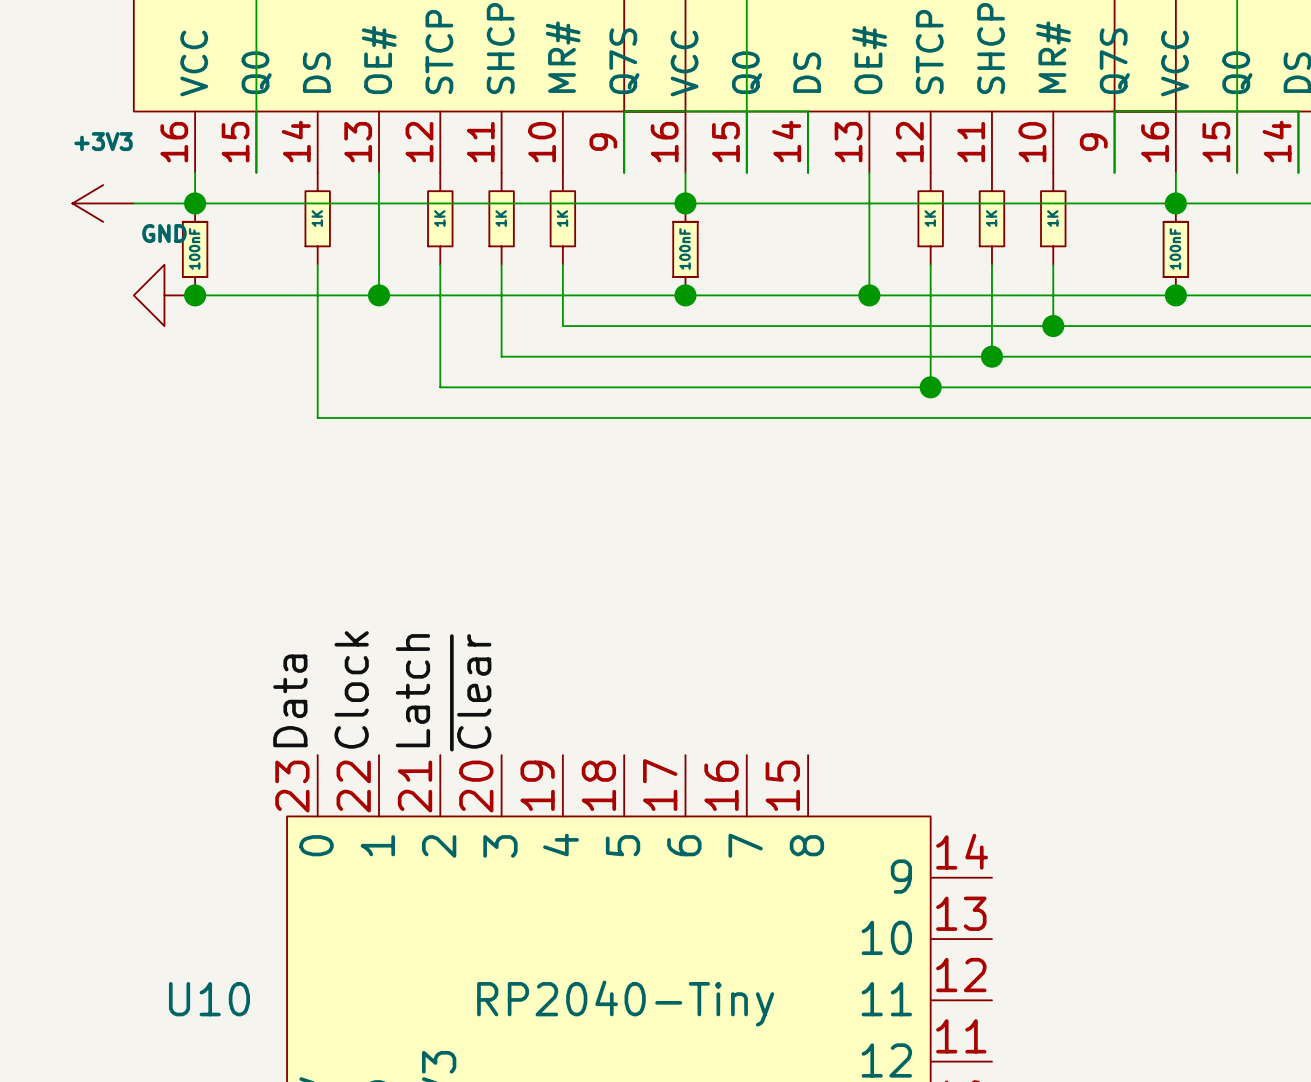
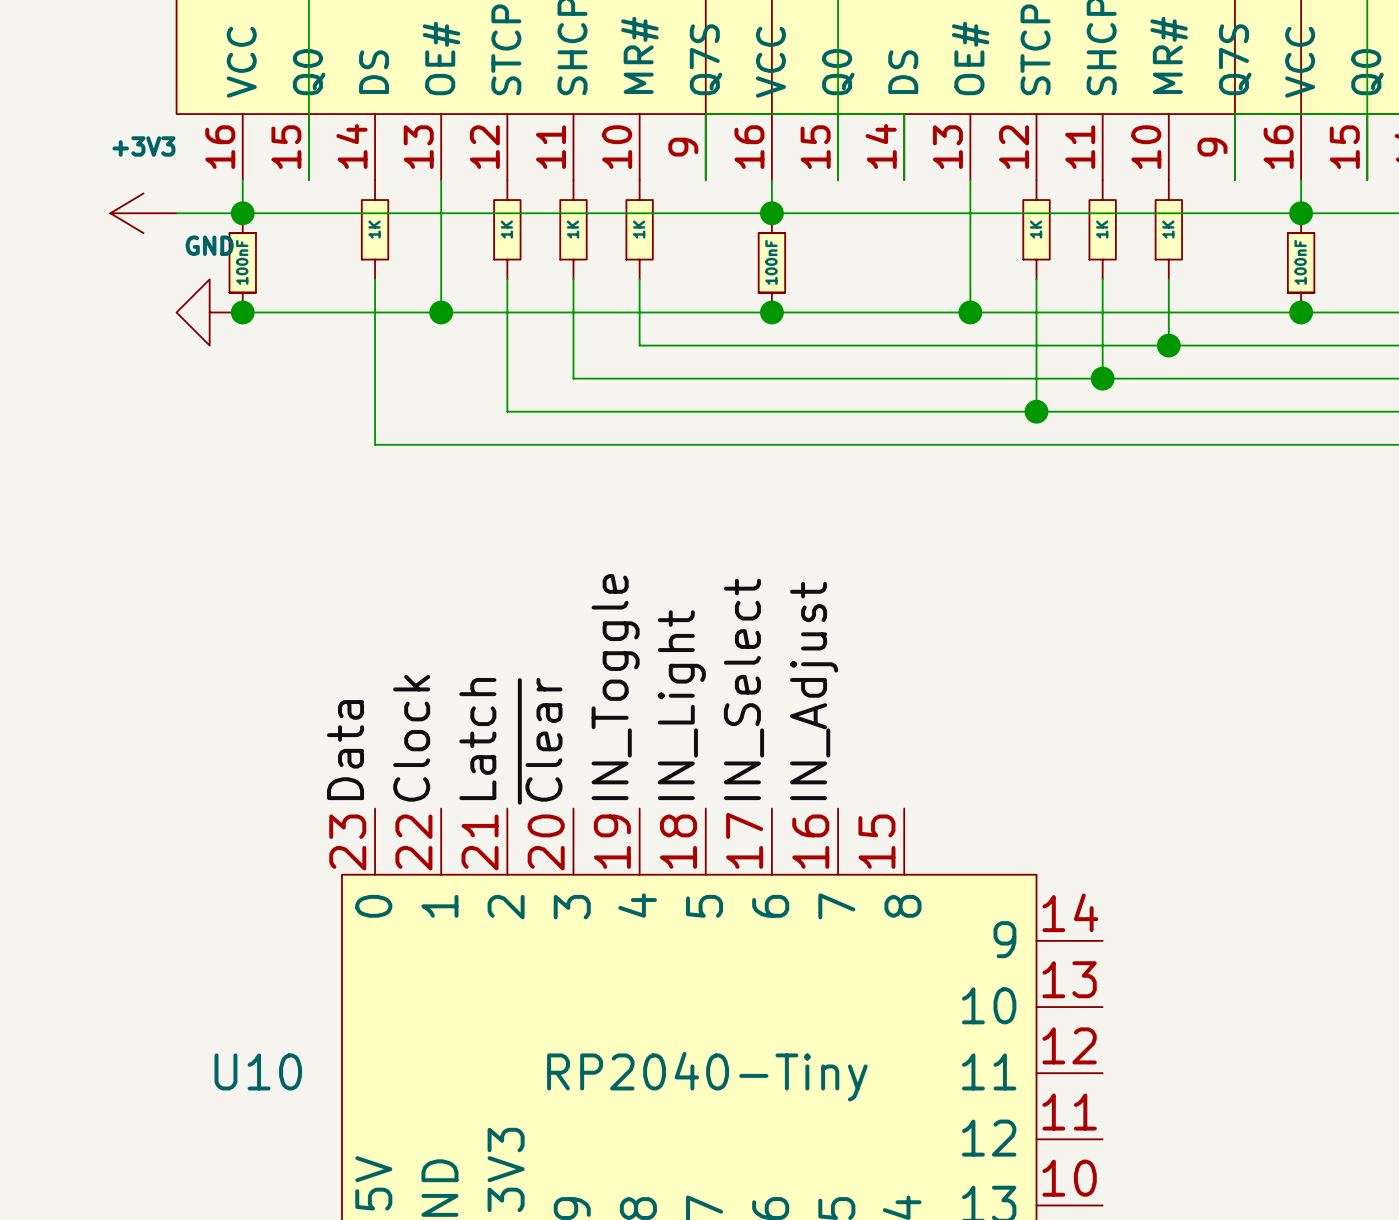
label: none -> IN_Toggle (615, 687)
label: none -> IN_Select (743, 689)
label: none -> IN_Adjust (814, 691)
label: none -> IN_Light (681, 705)

